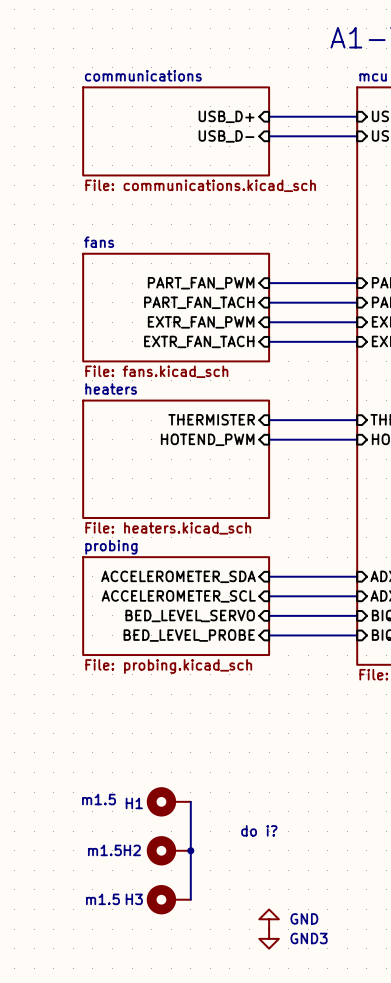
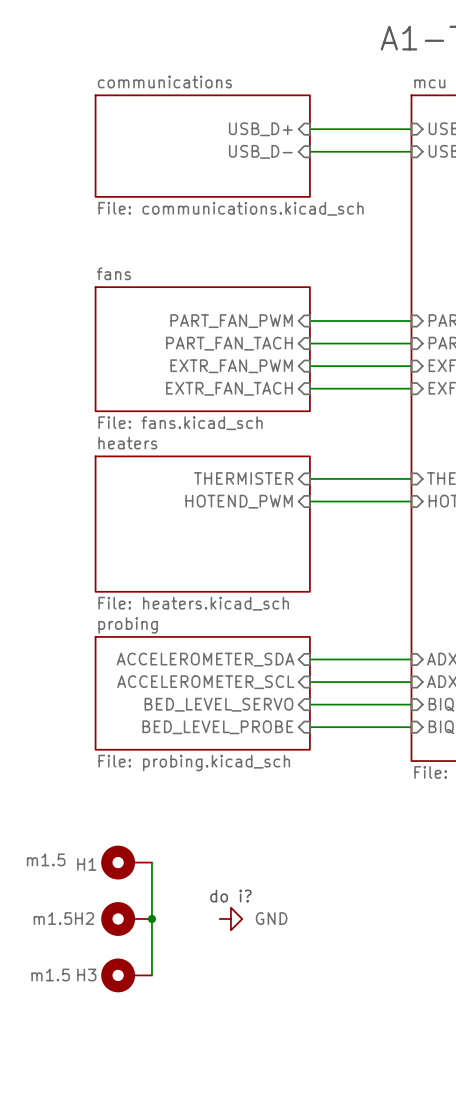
junction: none -> (151, 918)
H1 position: (168, 801) -> (126, 862)
wire: (190, 801) (190, 899) -> (151, 862) (151, 975)
text position: do i? (259, 830) -> do i? (230, 896)
H2 position: (168, 850) -> (126, 918)
junction: (190, 850) -> none
H3 position: (168, 899) -> (126, 975)
power symbol rotation: 0° (269, 919) -> 90° clockwise (230, 918)
power symbol position: GND (269, 919) -> GND (230, 918)
power symbol: GND3 (269, 938) -> none

